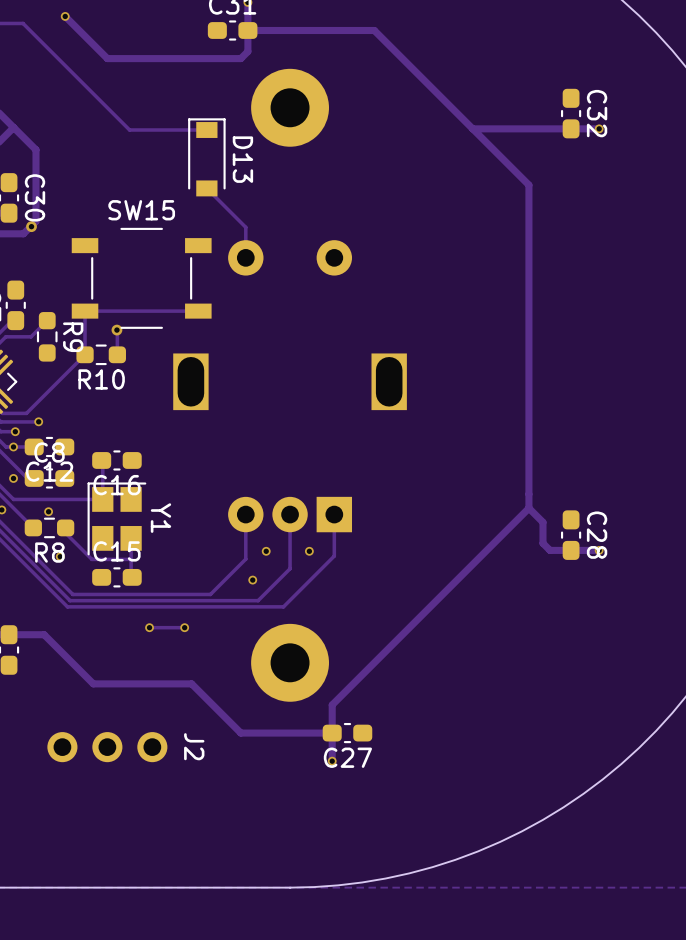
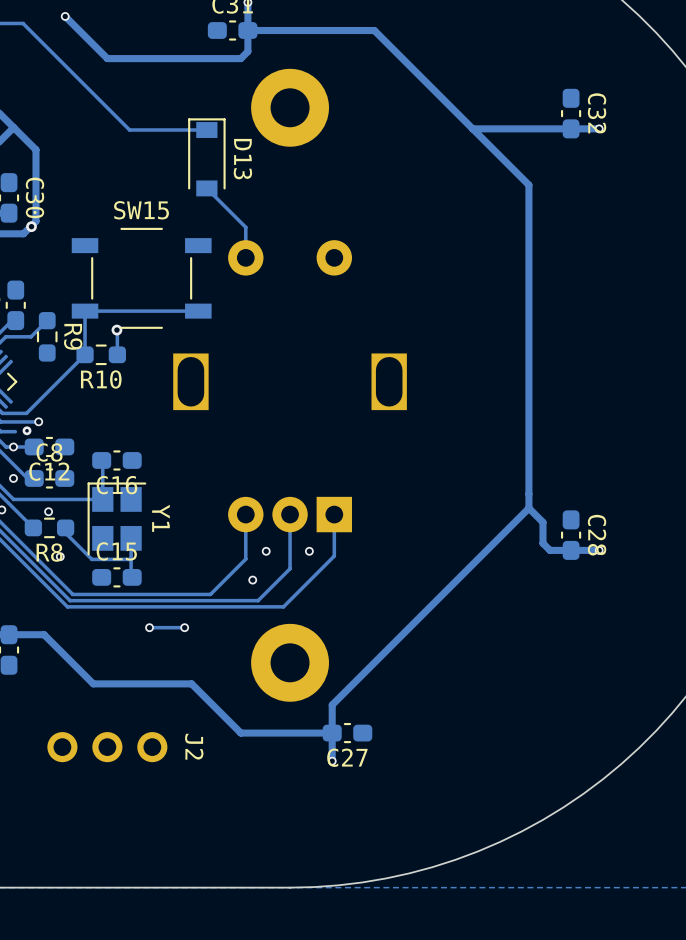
via: none -> (27, 430)
via: (15, 431) -> none

